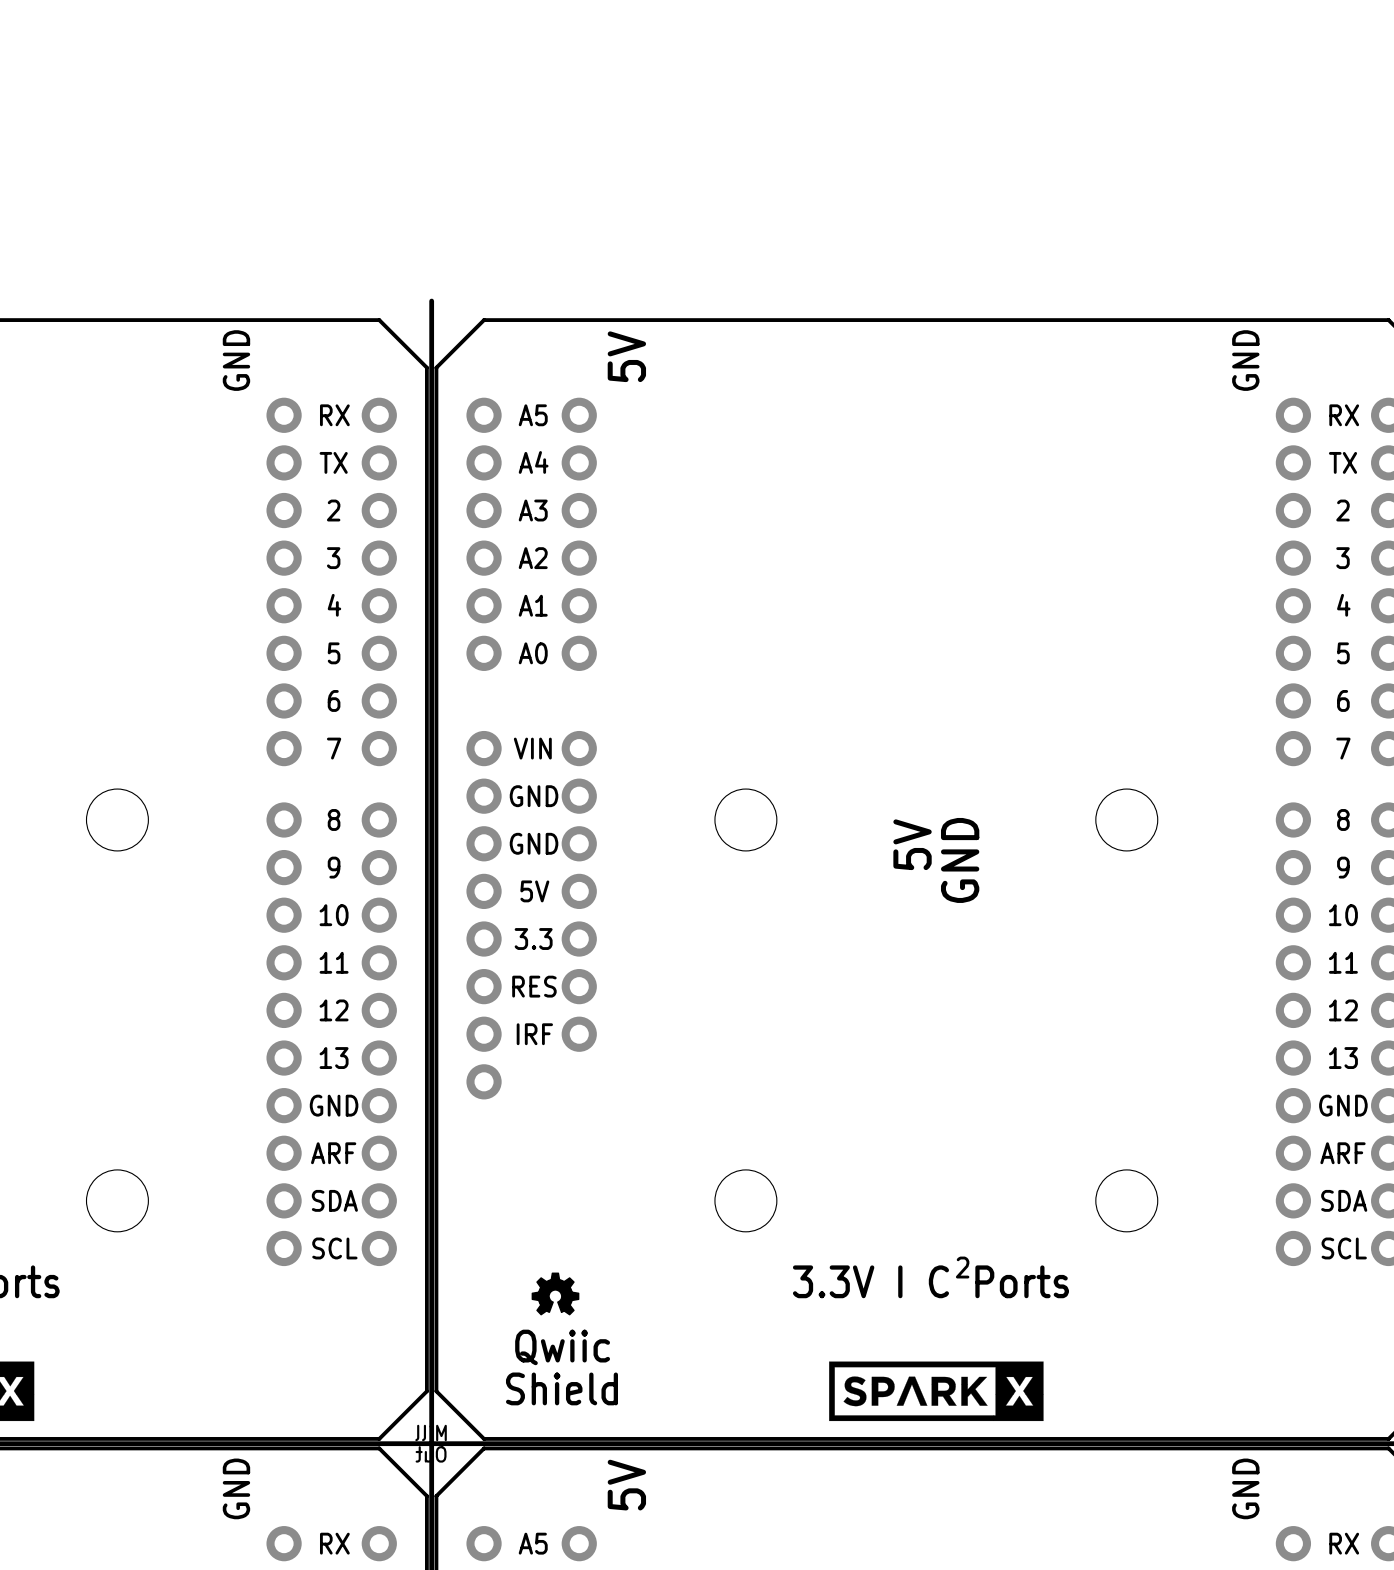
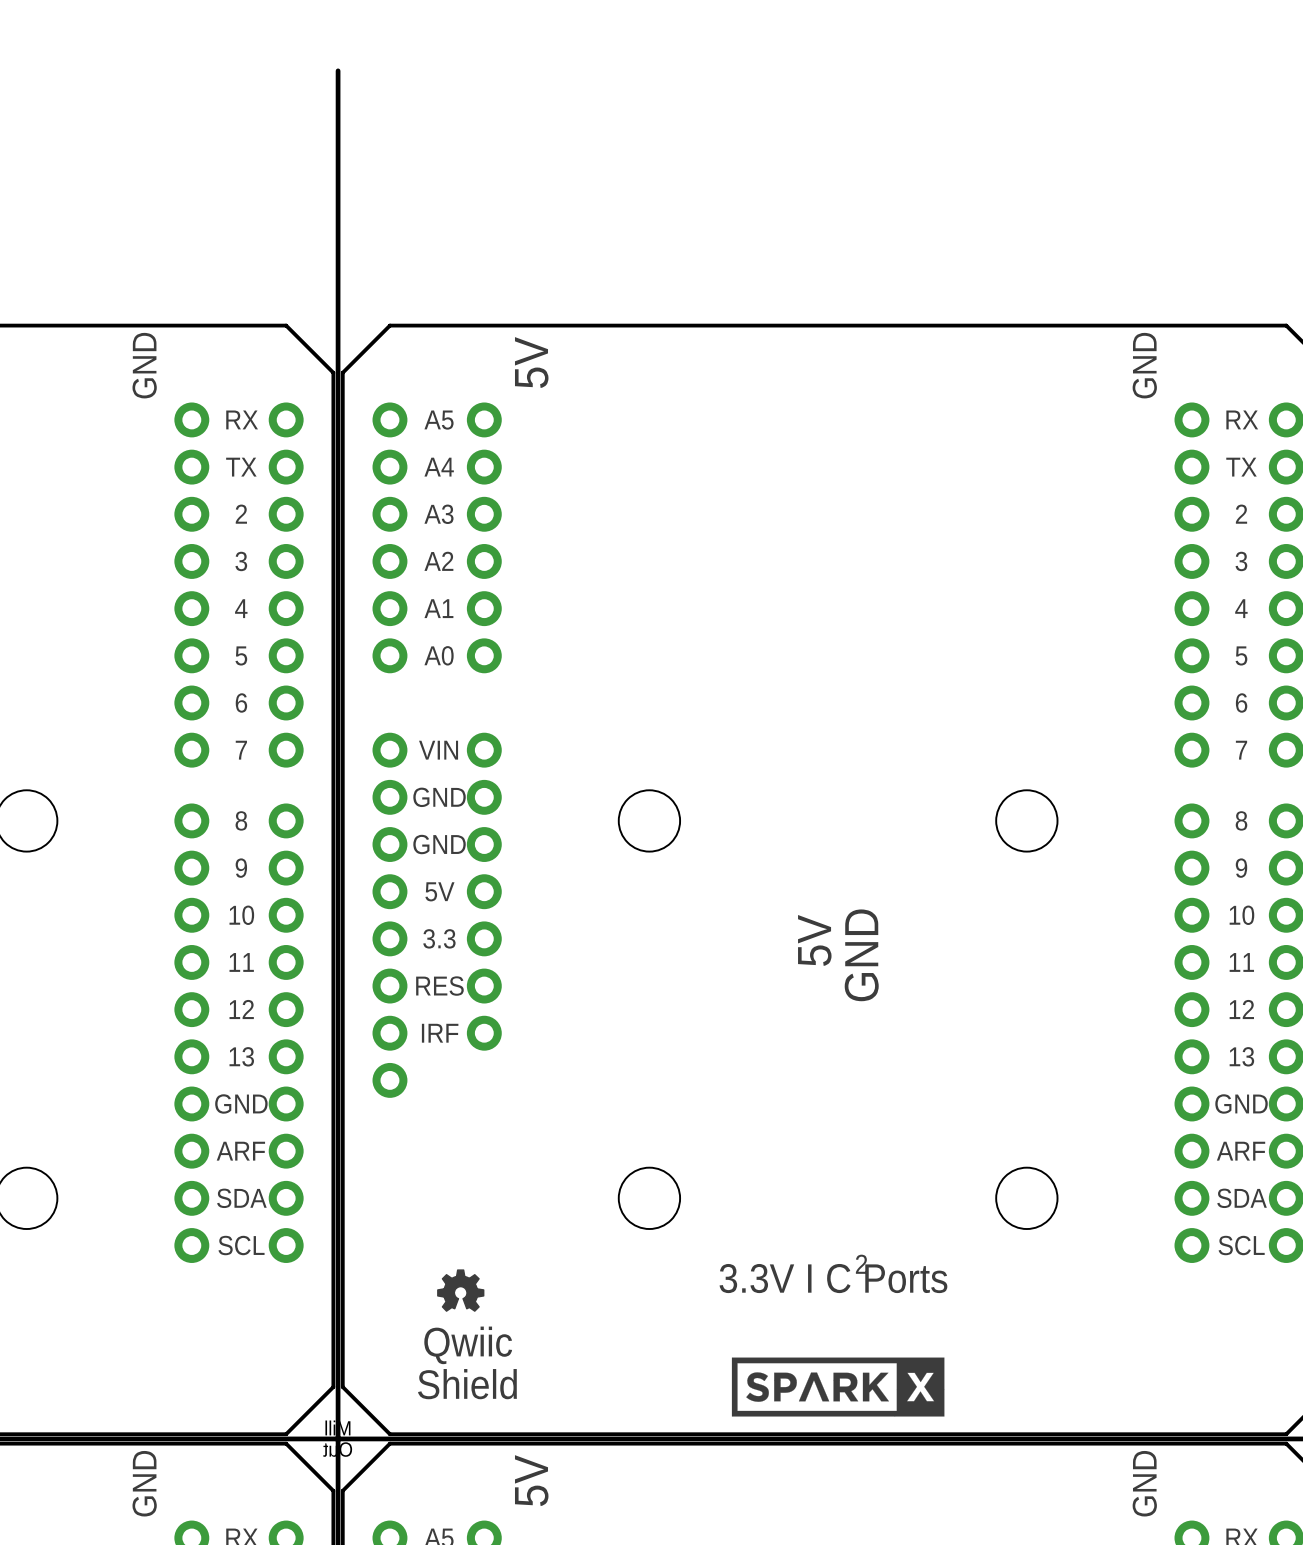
board edge: none -> (338, 70) (338, 306)
text position: 5V (912, 844) -> 5V (814, 940)
text position: GND (960, 860) -> GND (861, 955)

